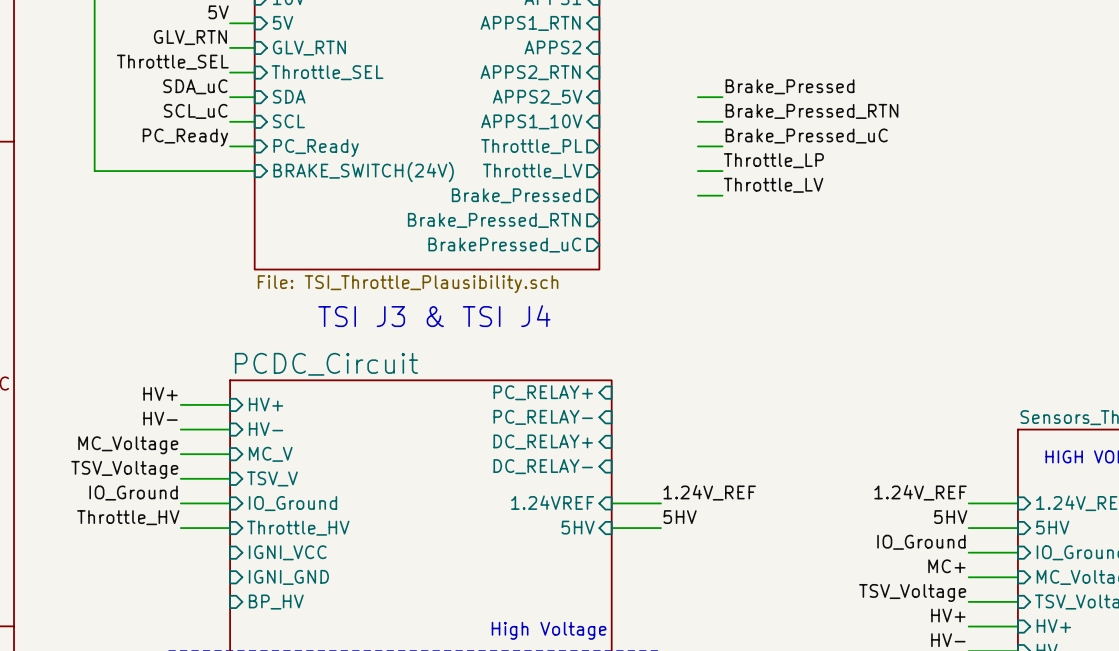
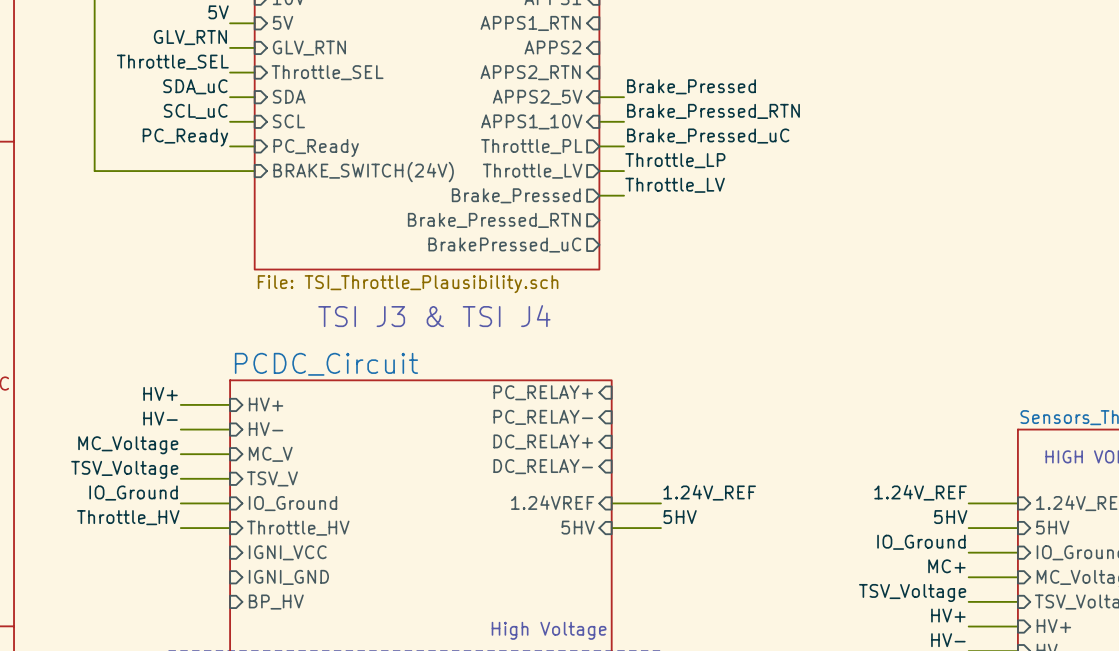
label position: Brake_Pressed (790, 86) -> Brake_Pressed (691, 86)
wire: (697, 97) (722, 97) -> (599, 97) (624, 97)
label position: Brake_Pressed_RTN (811, 111) -> Brake_Pressed_RTN (713, 111)
wire: (697, 121) (722, 121) -> (599, 121) (624, 121)
label position: Brake_Pressed_uC (806, 136) -> Brake_Pressed_uC (708, 136)
wire: (697, 146) (722, 146) -> (599, 146) (624, 146)
label position: Throttle_LP (773, 160) -> Throttle_LP (675, 160)
wire: (697, 171) (722, 171) -> (599, 171) (624, 171)
label position: Throttle_LV (773, 185) -> Throttle_LV (675, 185)
wire: (697, 195) (722, 195) -> (599, 195) (624, 195)

